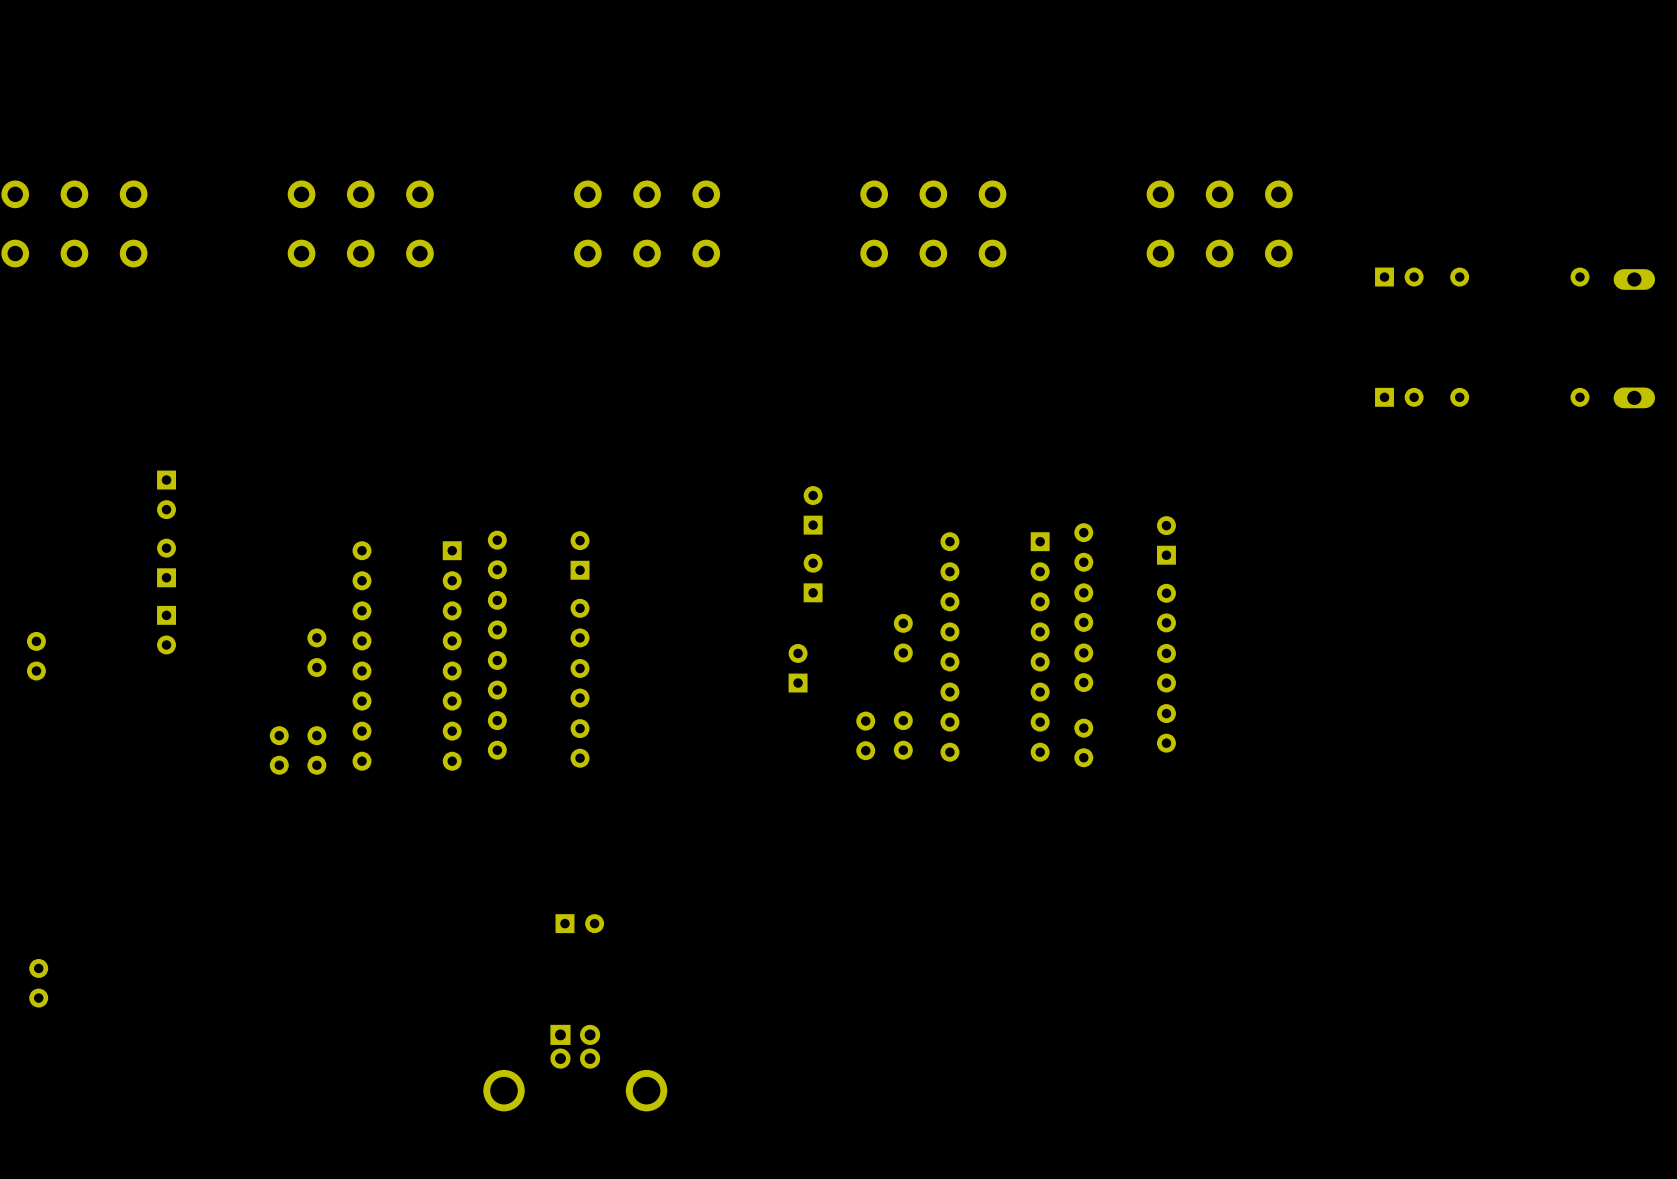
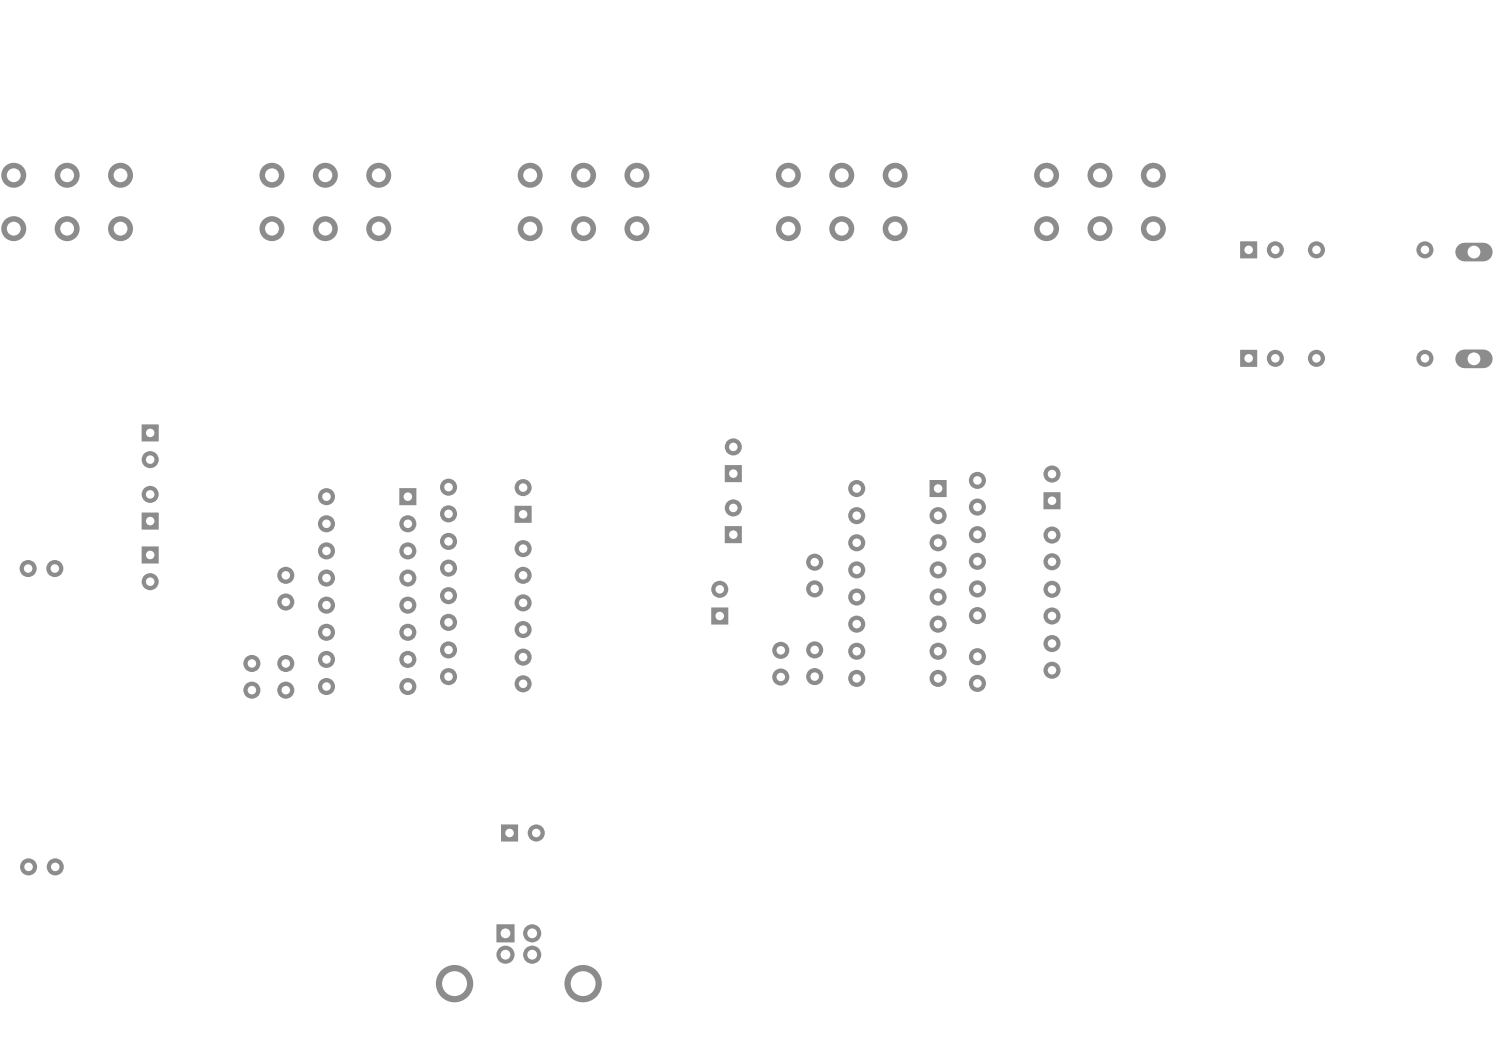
part rotation: 0° (36, 656) -> 90° clockwise (41, 568)
part rotation: 0° (38, 983) -> 90° clockwise (41, 866)

